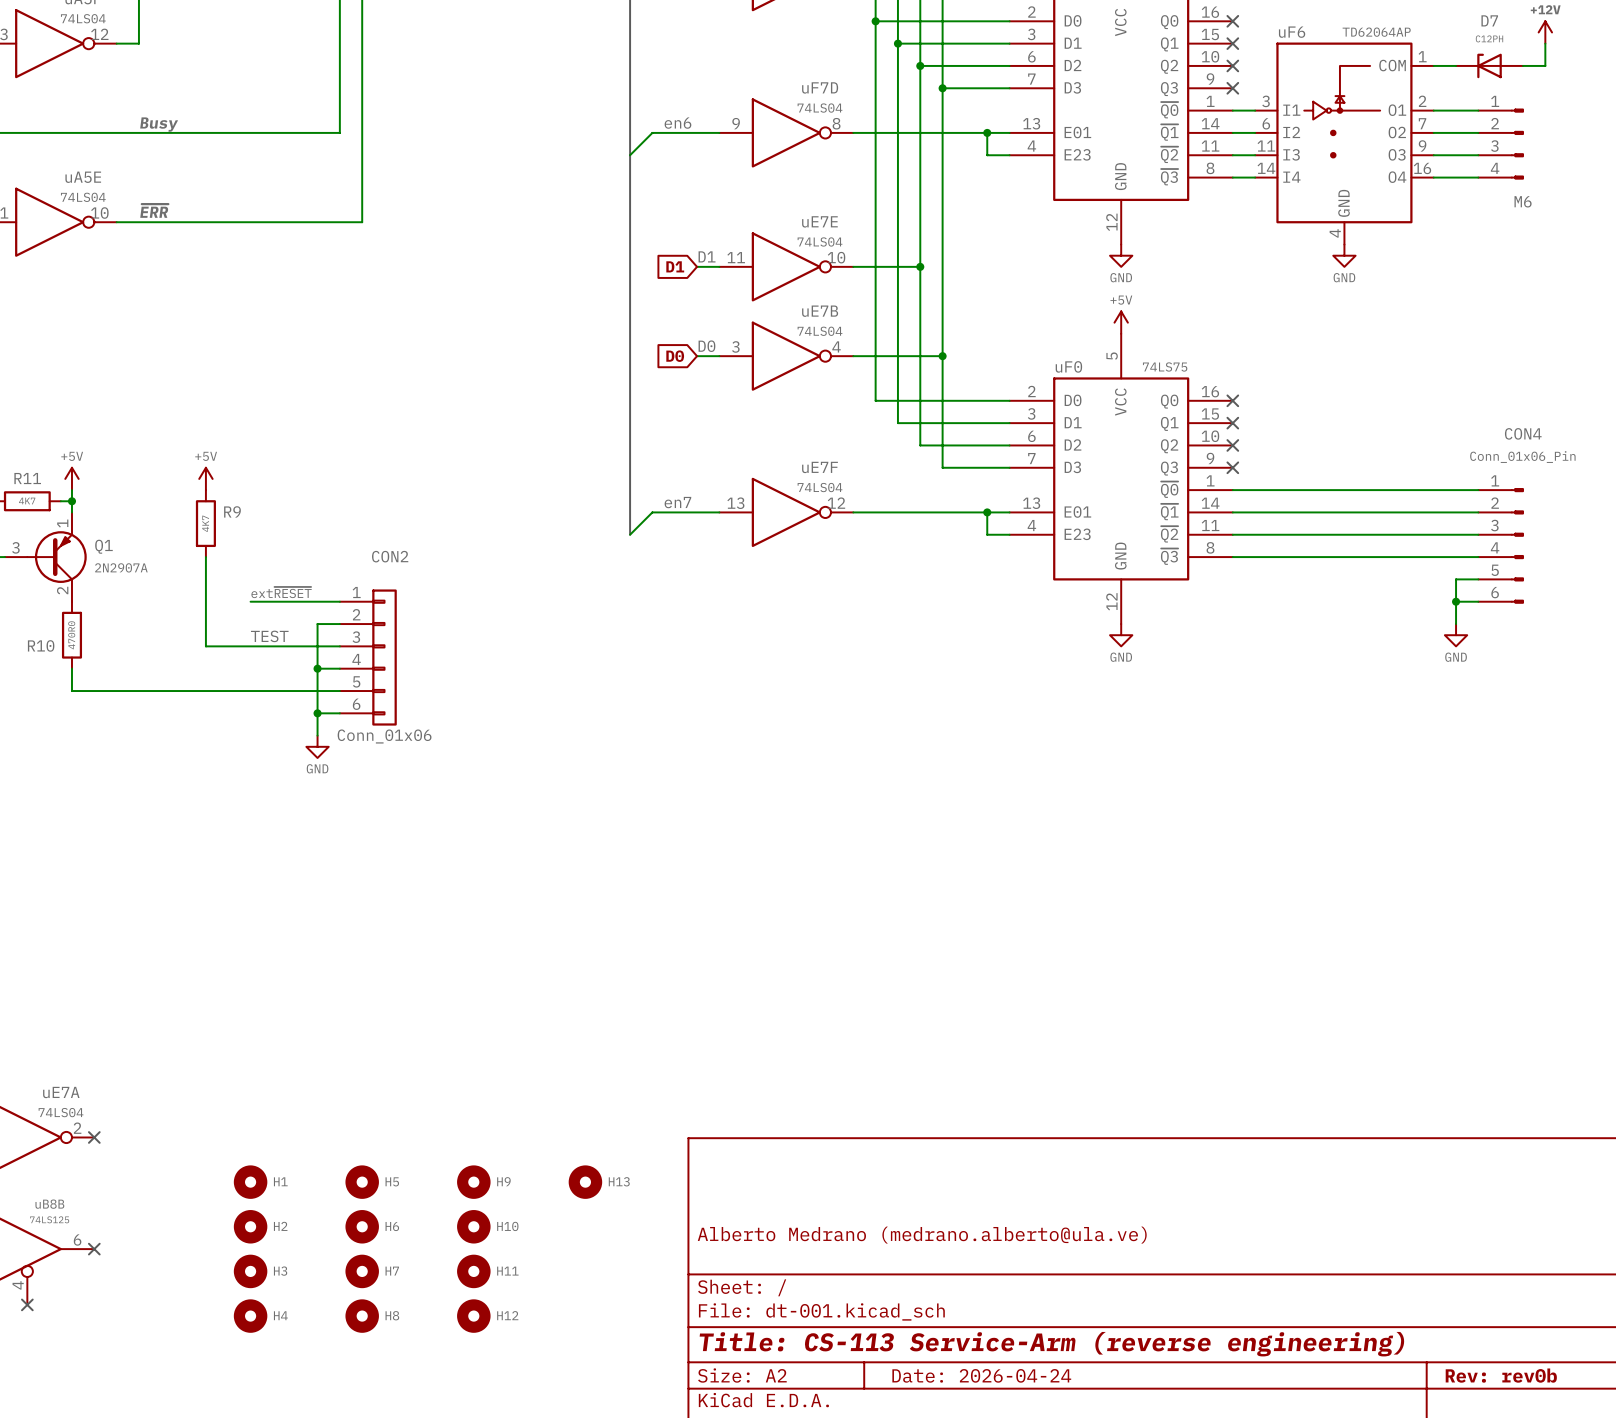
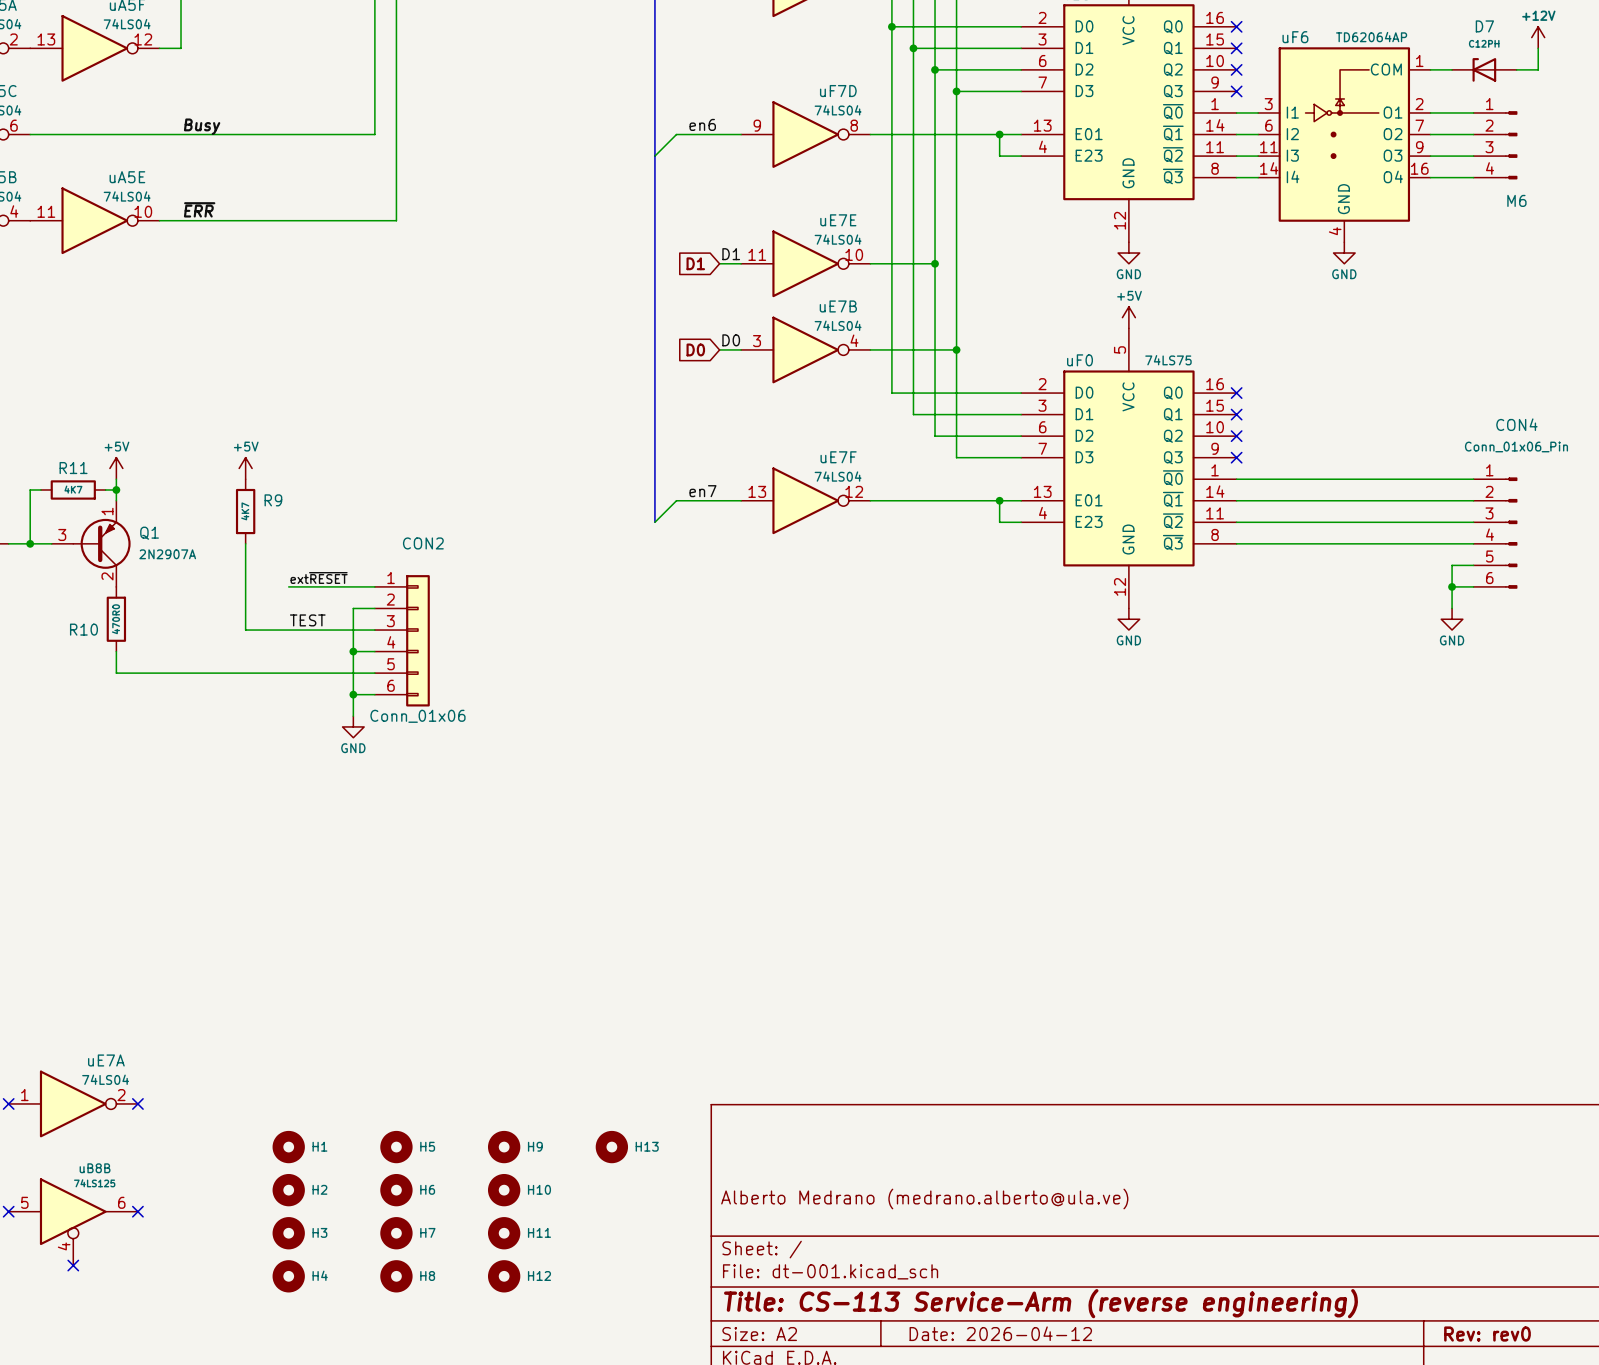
title block: Date: 2026-04-24 (981, 1375) -> Date: 2026-04-12 (1000, 1333)
title block: Rev: rev0b (1501, 1375) -> Rev: rev0 (1487, 1334)

